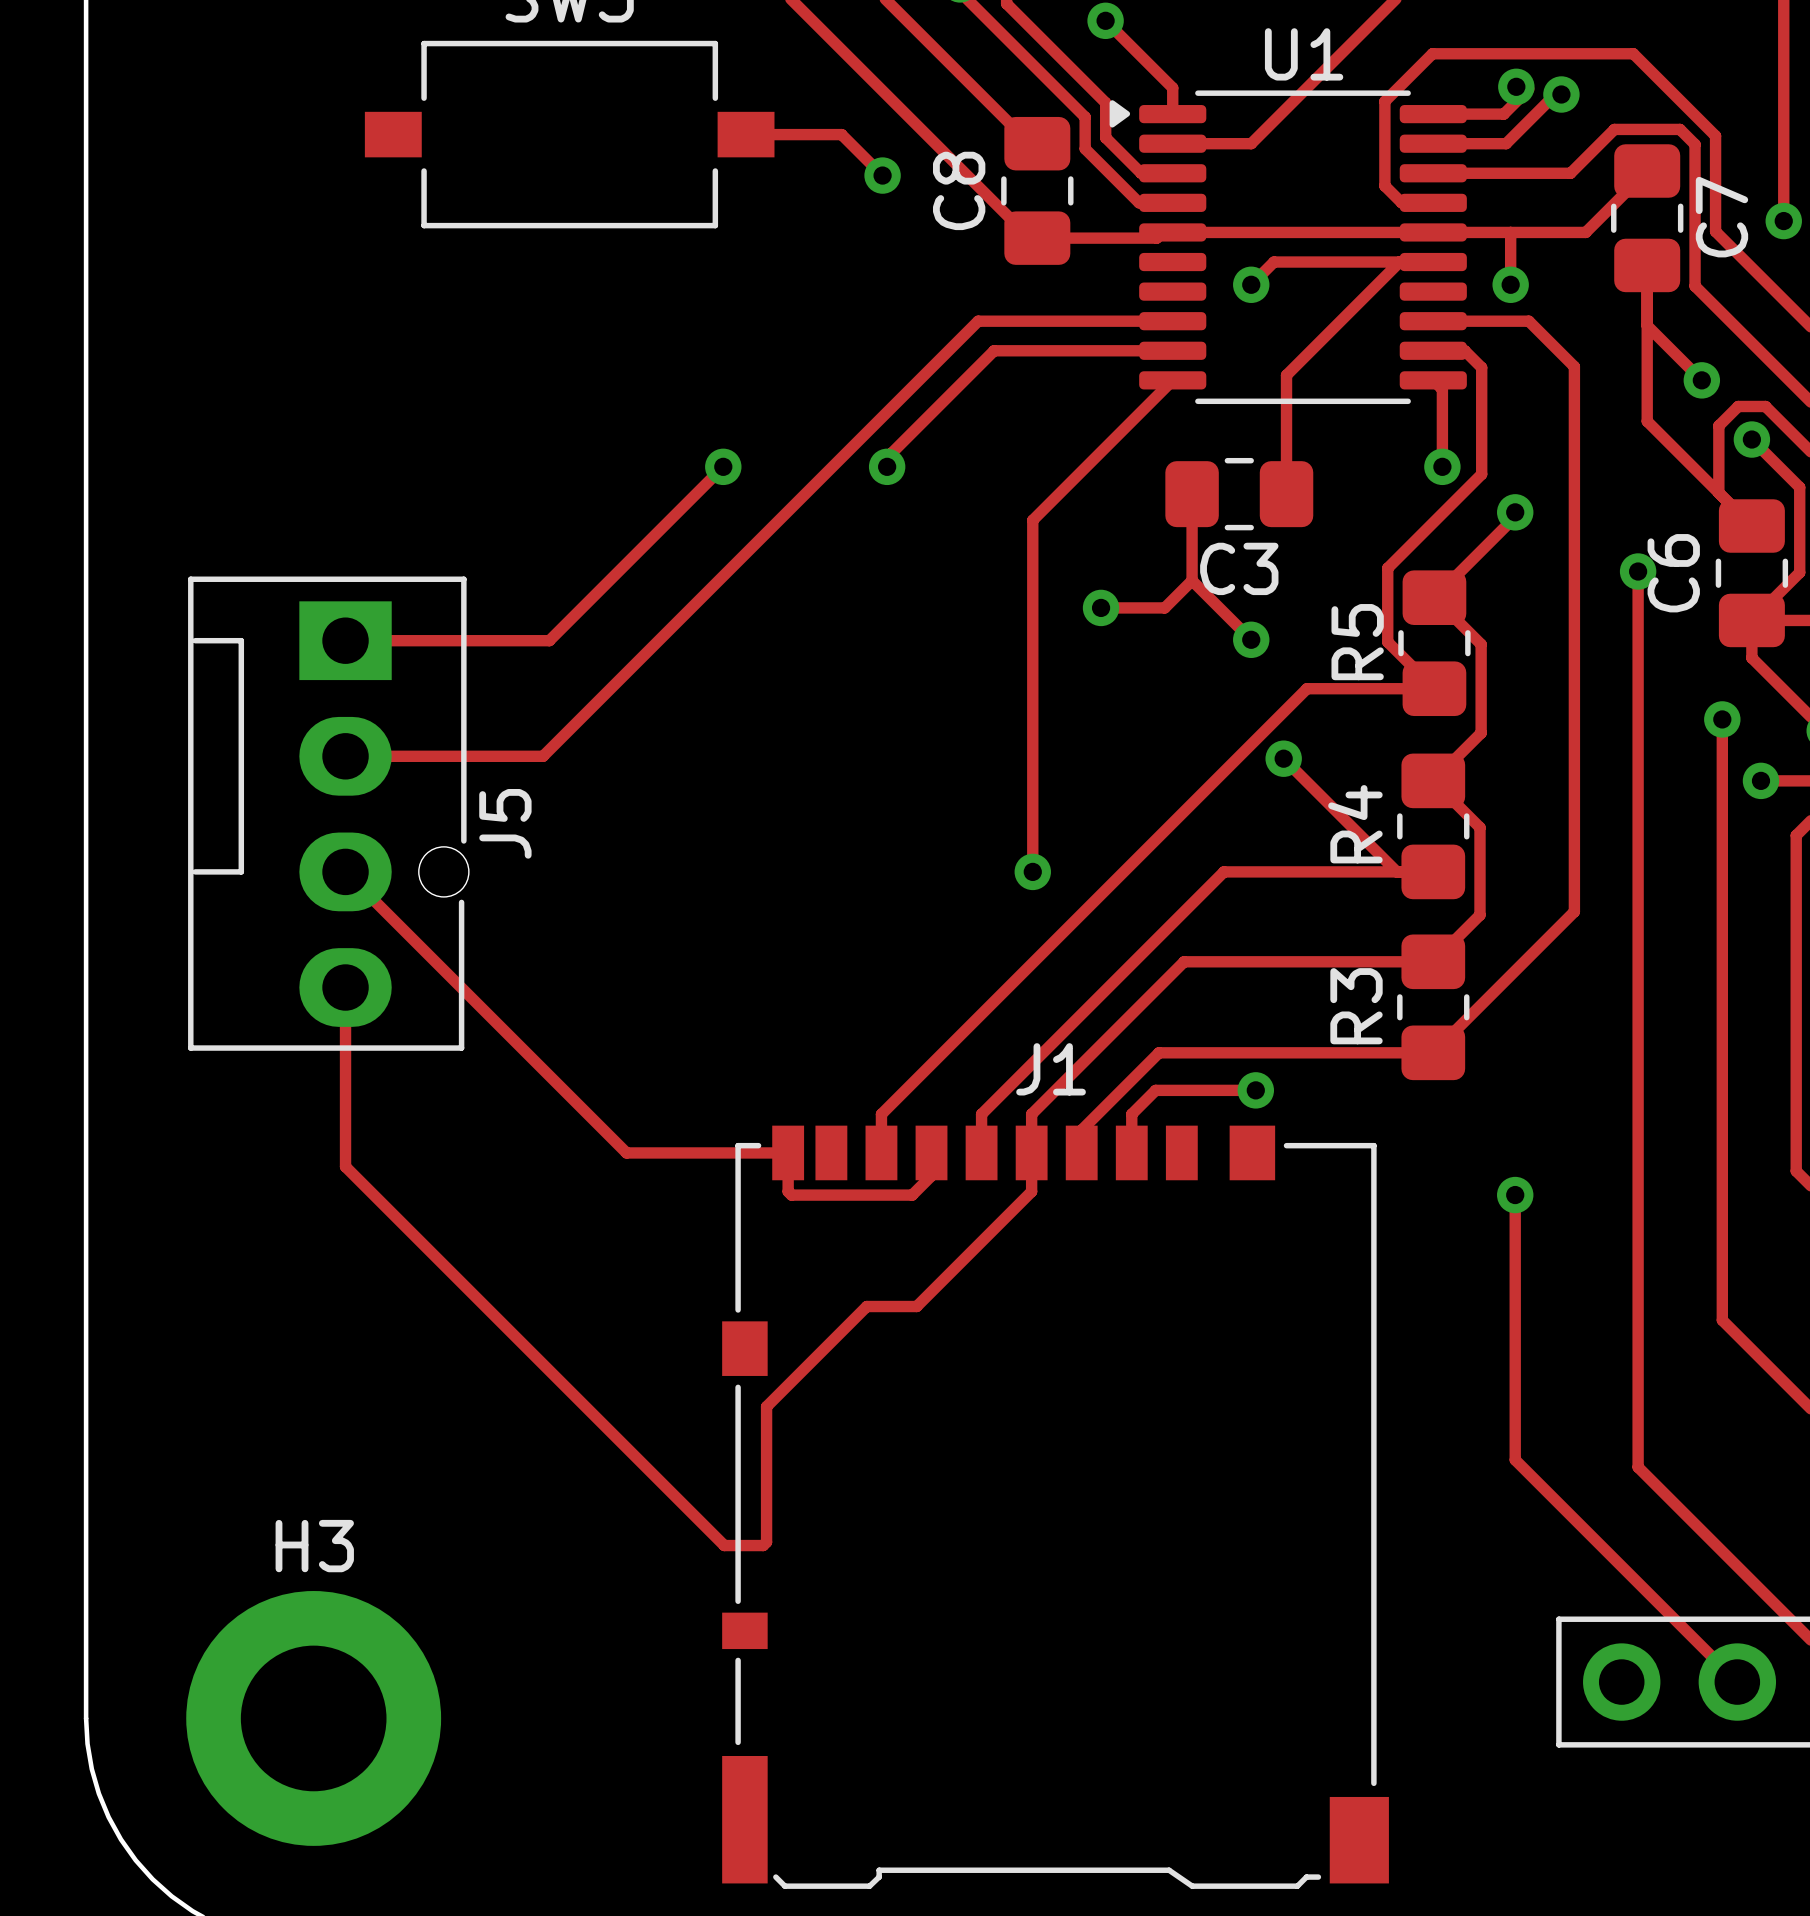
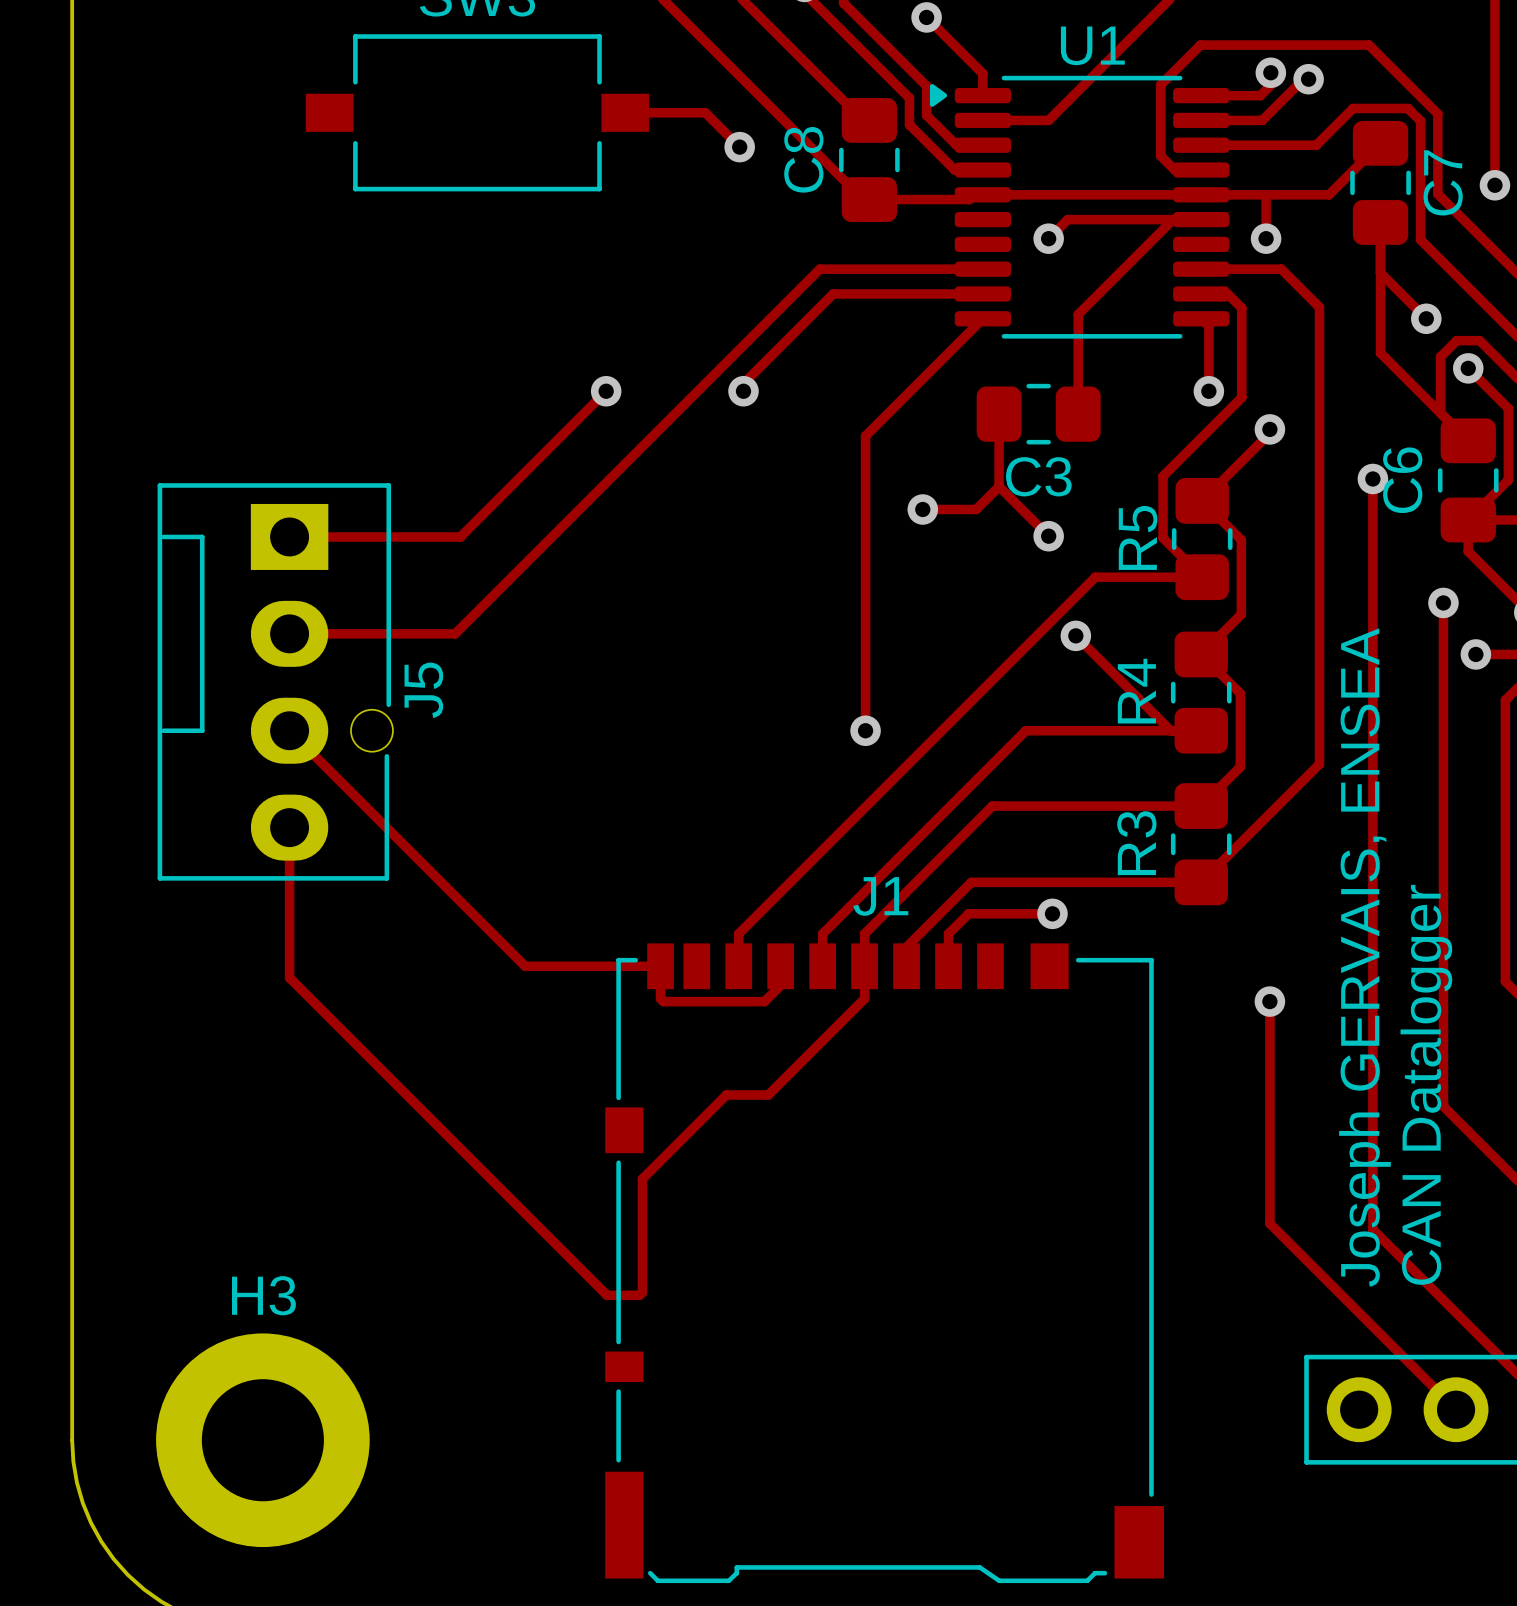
text: none -> Joseph GERVAIS, ENSEA (1364, 957)
text: none -> CAN Datalogger (1426, 1084)

